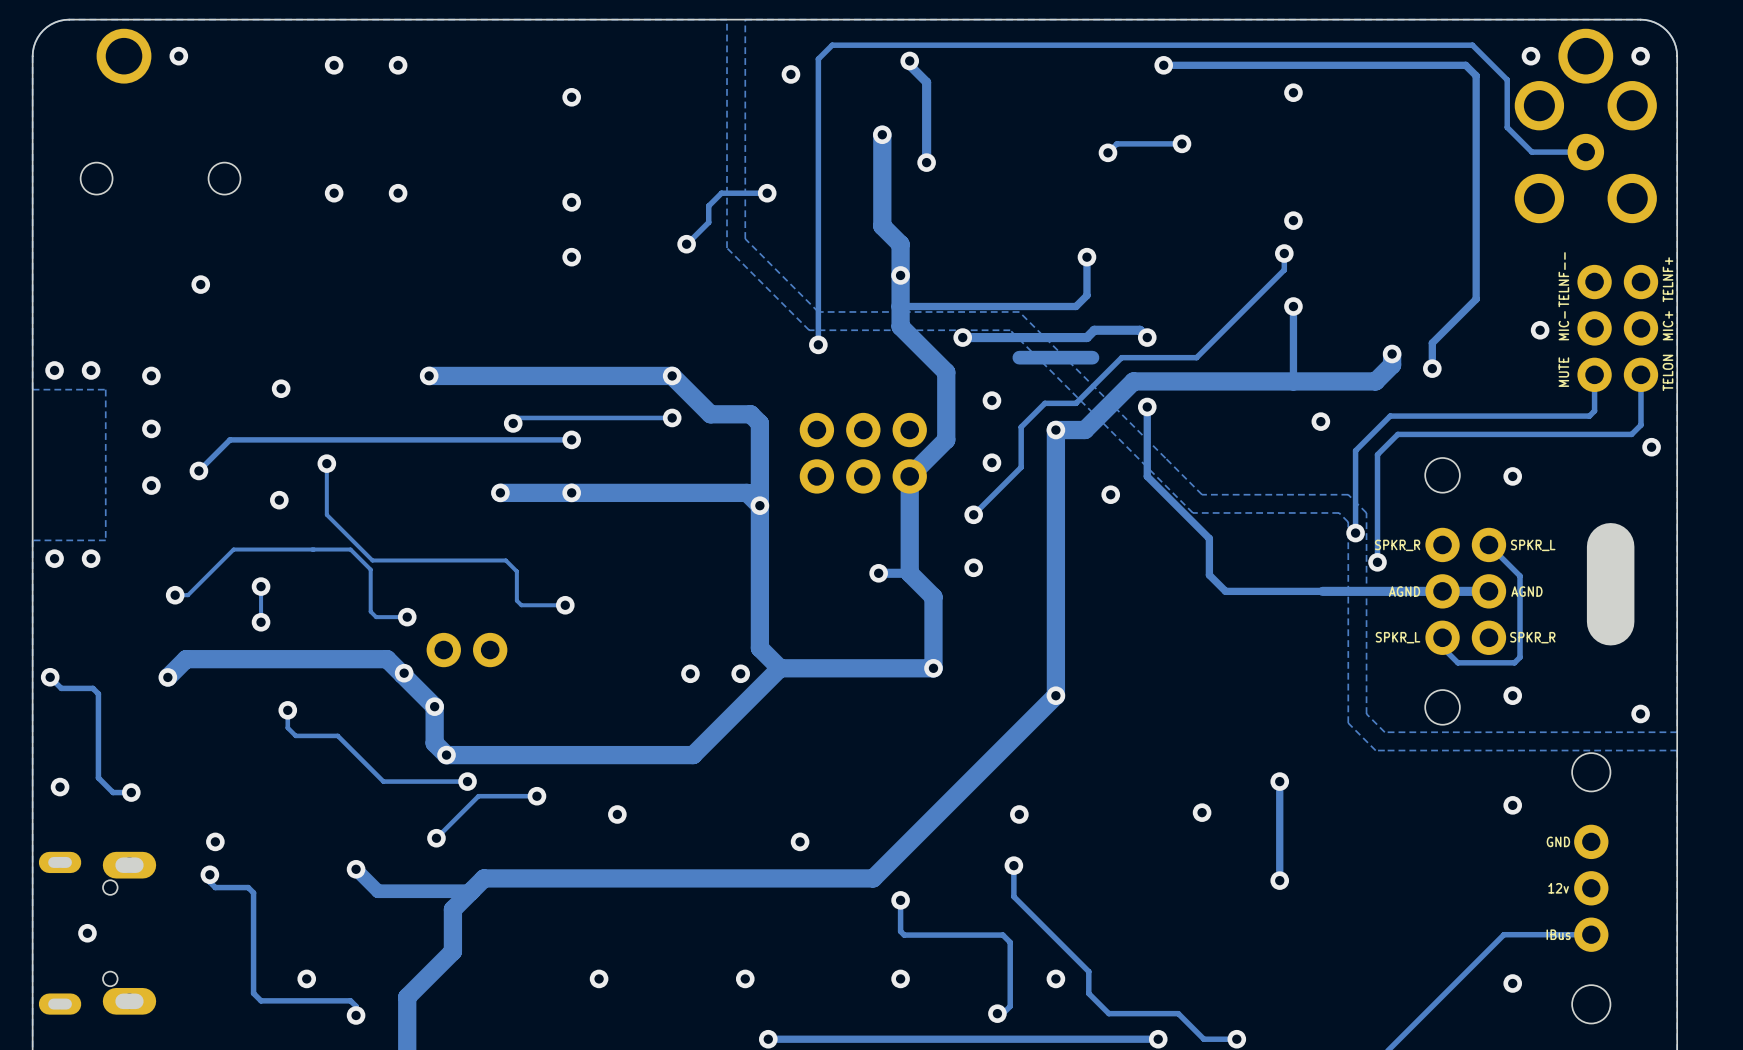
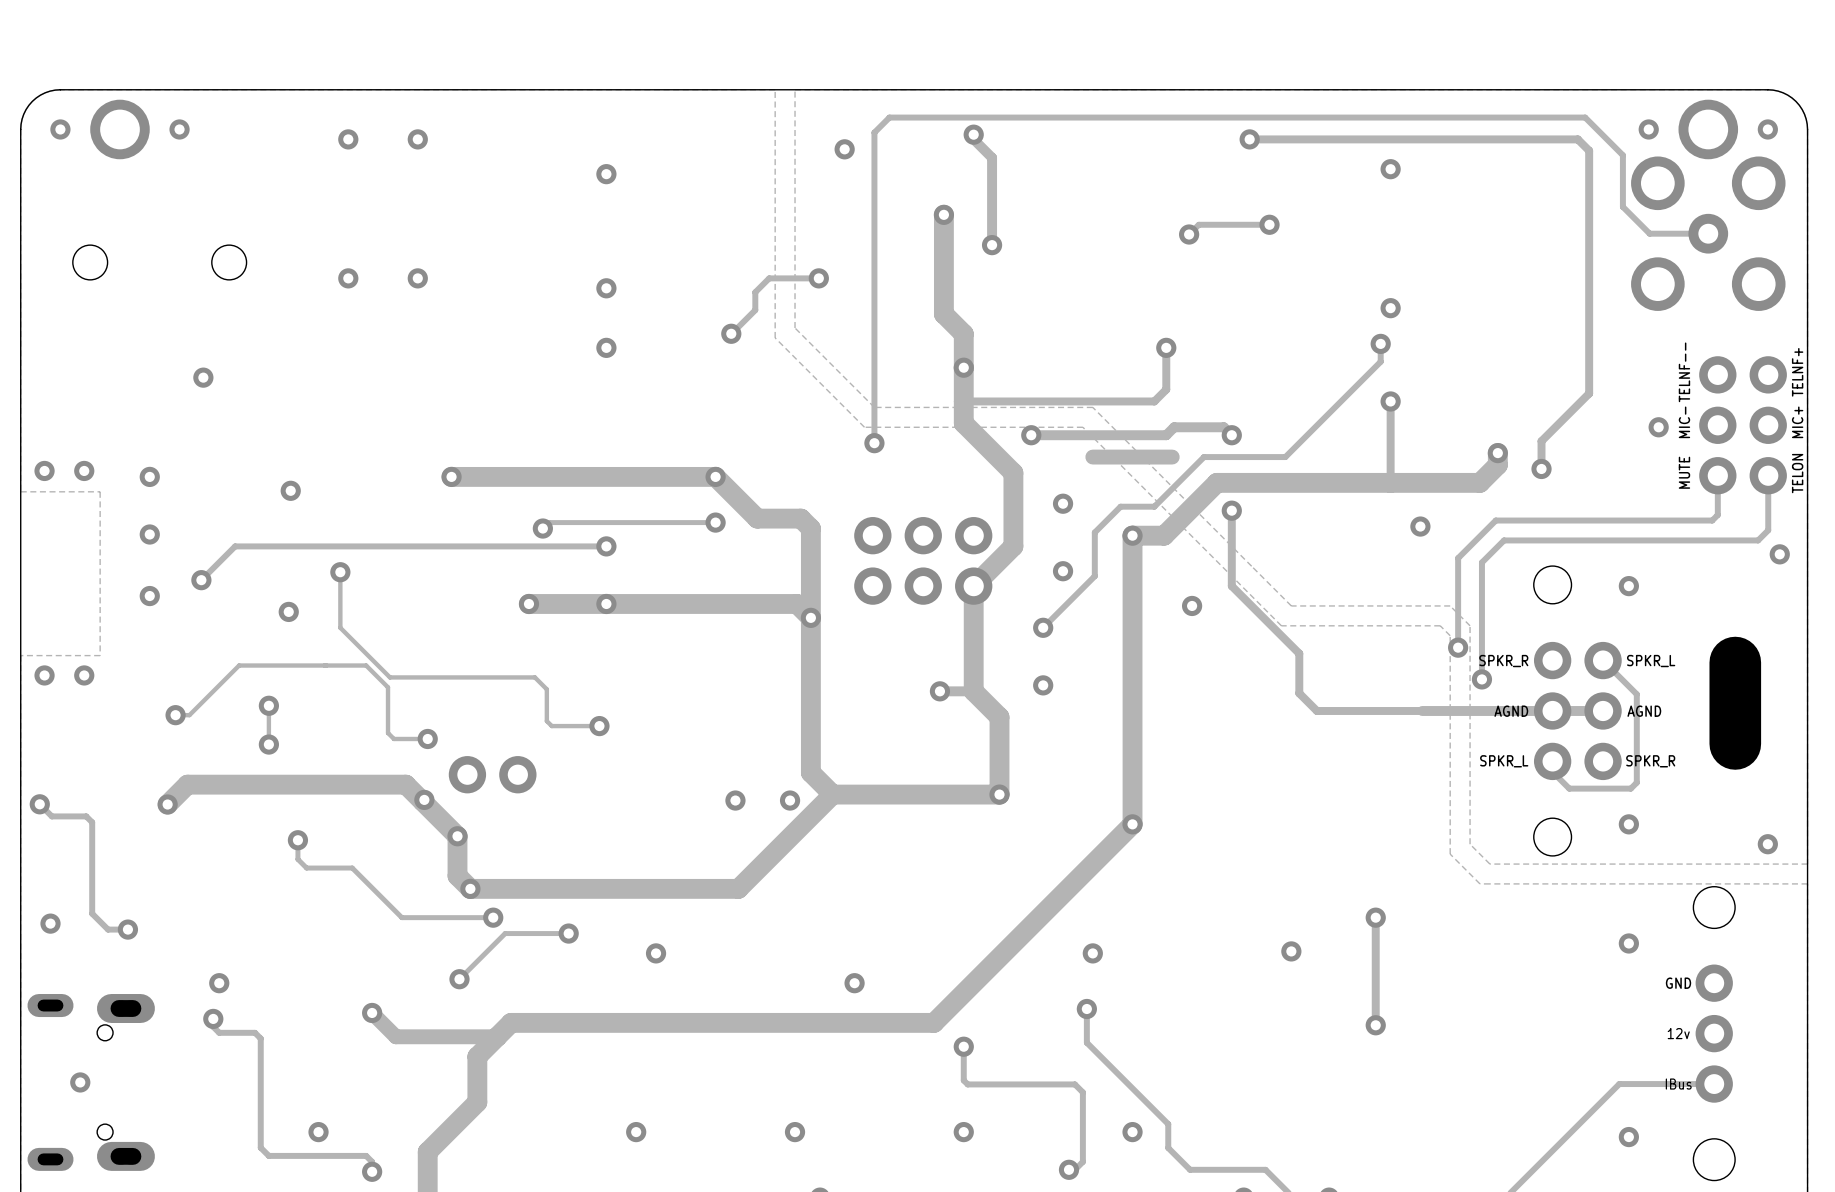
via: none -> (60, 129)

